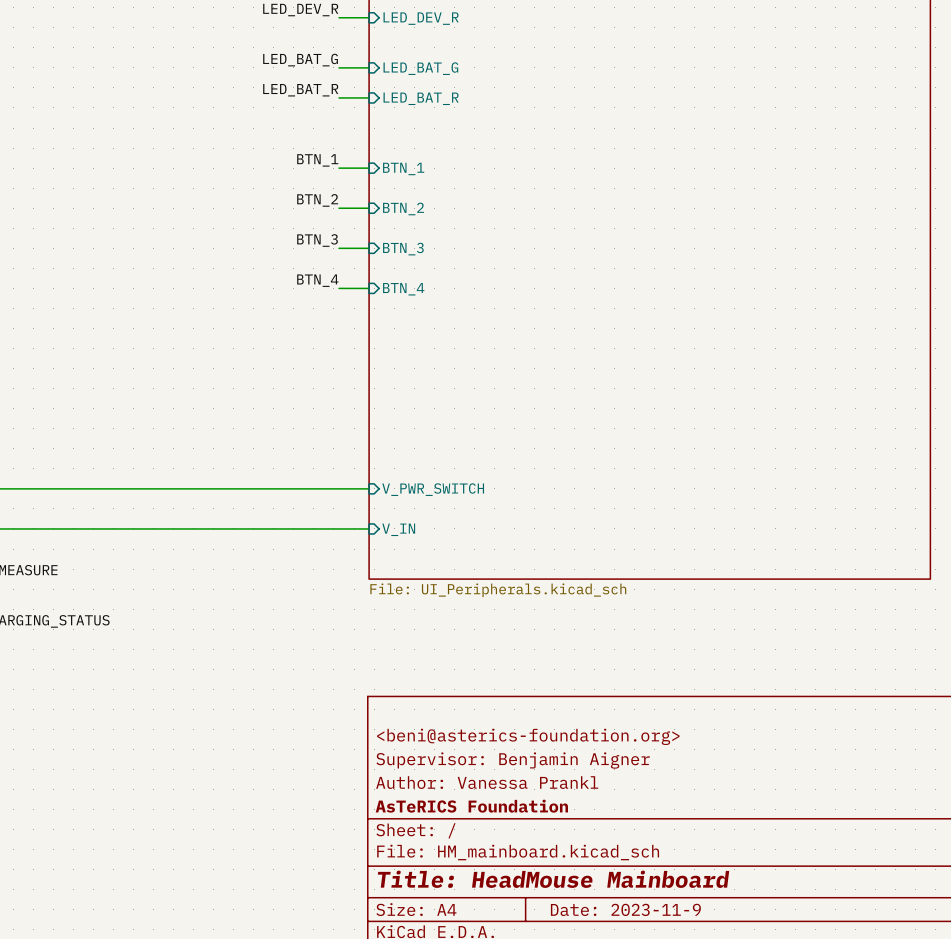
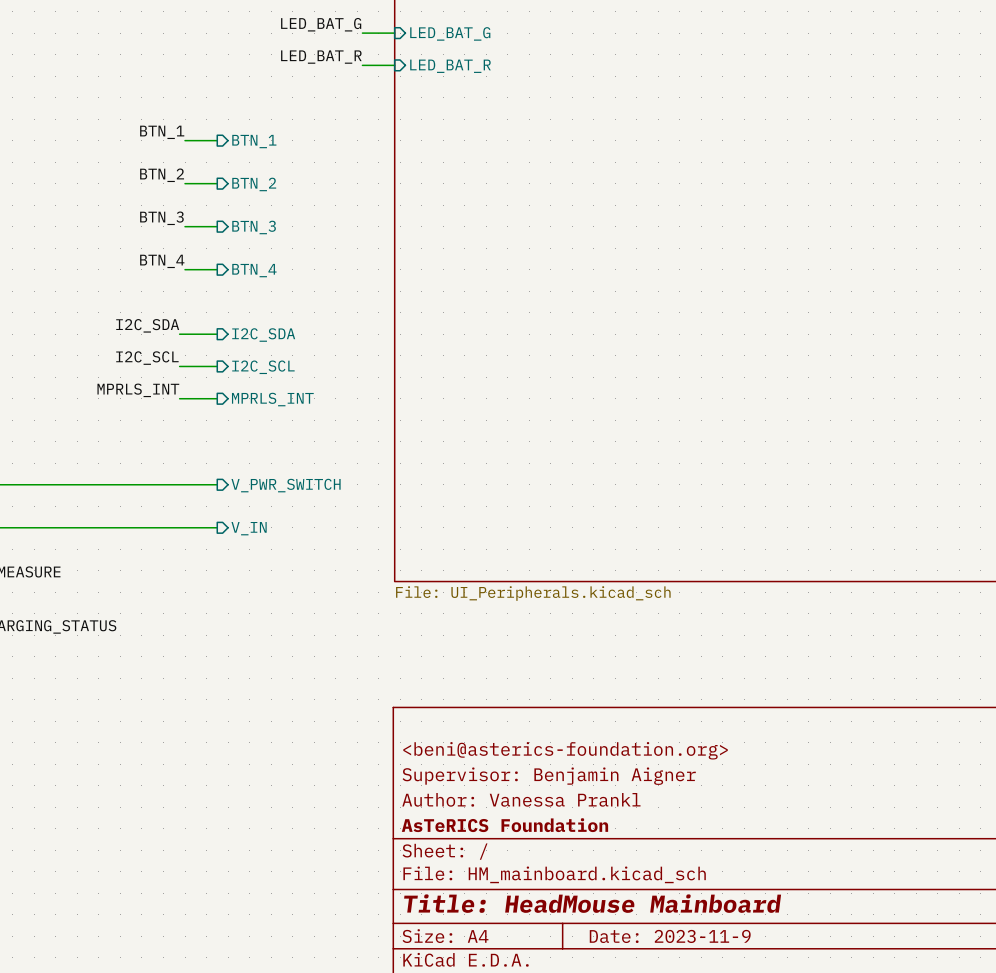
label position: BTN_1 (317, 160) -> BTN_1 (162, 132)
wire: (339, 168) (369, 168) -> (185, 140) (217, 140)
sheet pin position: BTN_1 (403, 168) -> BTN_1 (254, 141)
label position: BTN_2 (317, 200) -> BTN_2 (162, 175)
wire: (339, 208) (369, 208) -> (185, 183) (217, 183)
sheet pin position: BTN_2 (403, 208) -> BTN_2 (254, 184)
label position: BTN_3 (317, 240) -> BTN_3 (161, 218)
wire: (339, 248) (369, 248) -> (185, 226) (217, 226)
sheet pin position: BTN_3 (403, 249) -> BTN_3 (254, 227)
label position: BTN_4 (317, 280) -> BTN_4 (162, 261)
wire: (339, 288) (369, 288) -> (185, 269) (217, 269)
sheet pin position: BTN_4 (403, 289) -> BTN_4 (254, 270)
label: none -> I2C_SDA (147, 325)
wire: none -> (179, 334) (217, 334)
sheet pin: none -> I2C_SDA (263, 335)
label: none -> I2C_SCL (147, 358)
wire: none -> (179, 366) (217, 366)
sheet pin: none -> I2C_SCL (263, 367)
label: none -> MPRLS_INT (138, 390)
wire: none -> (179, 398) (217, 398)
sheet pin: none -> MPRLS_INT (272, 399)
wire: (203, 488) (369, 488) -> none
sheet pin: none -> V_PWR_SWITCH (286, 485)
sheet pin: V_PWR_SWITCH (433, 489) -> none
wire: (203, 528) (369, 528) -> none
sheet pin: none -> V_IN (249, 528)
sheet pin: V_IN (398, 529) -> none

